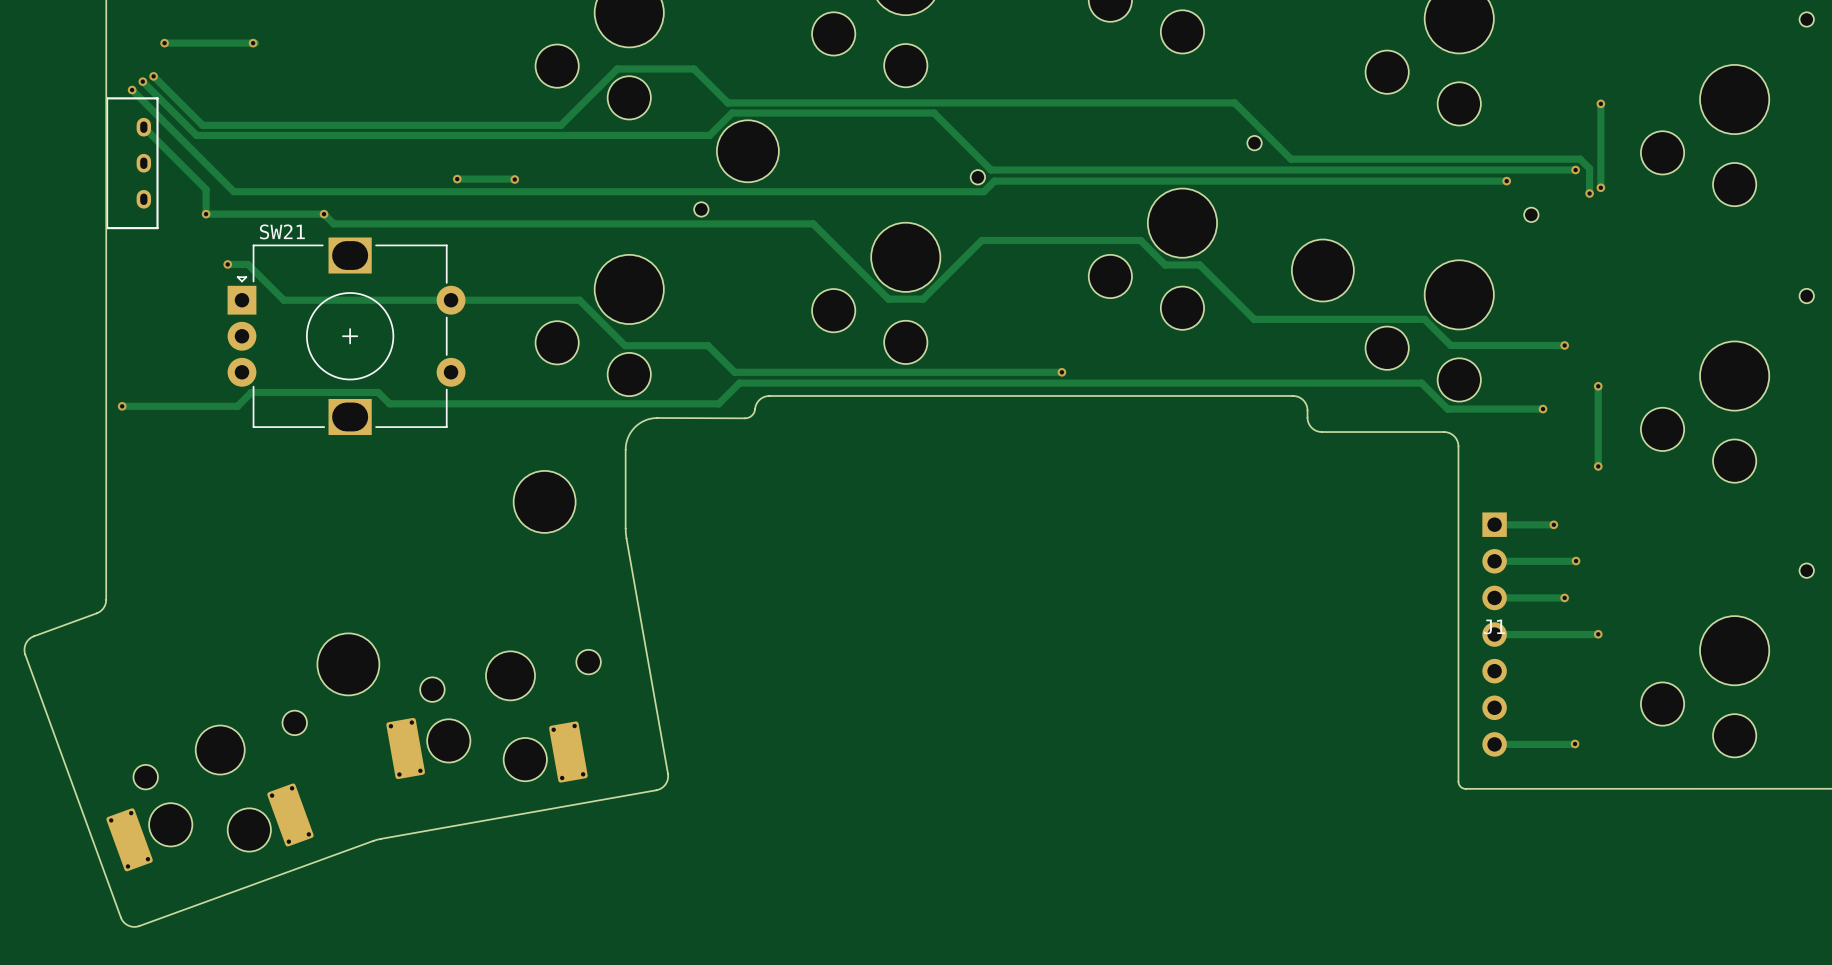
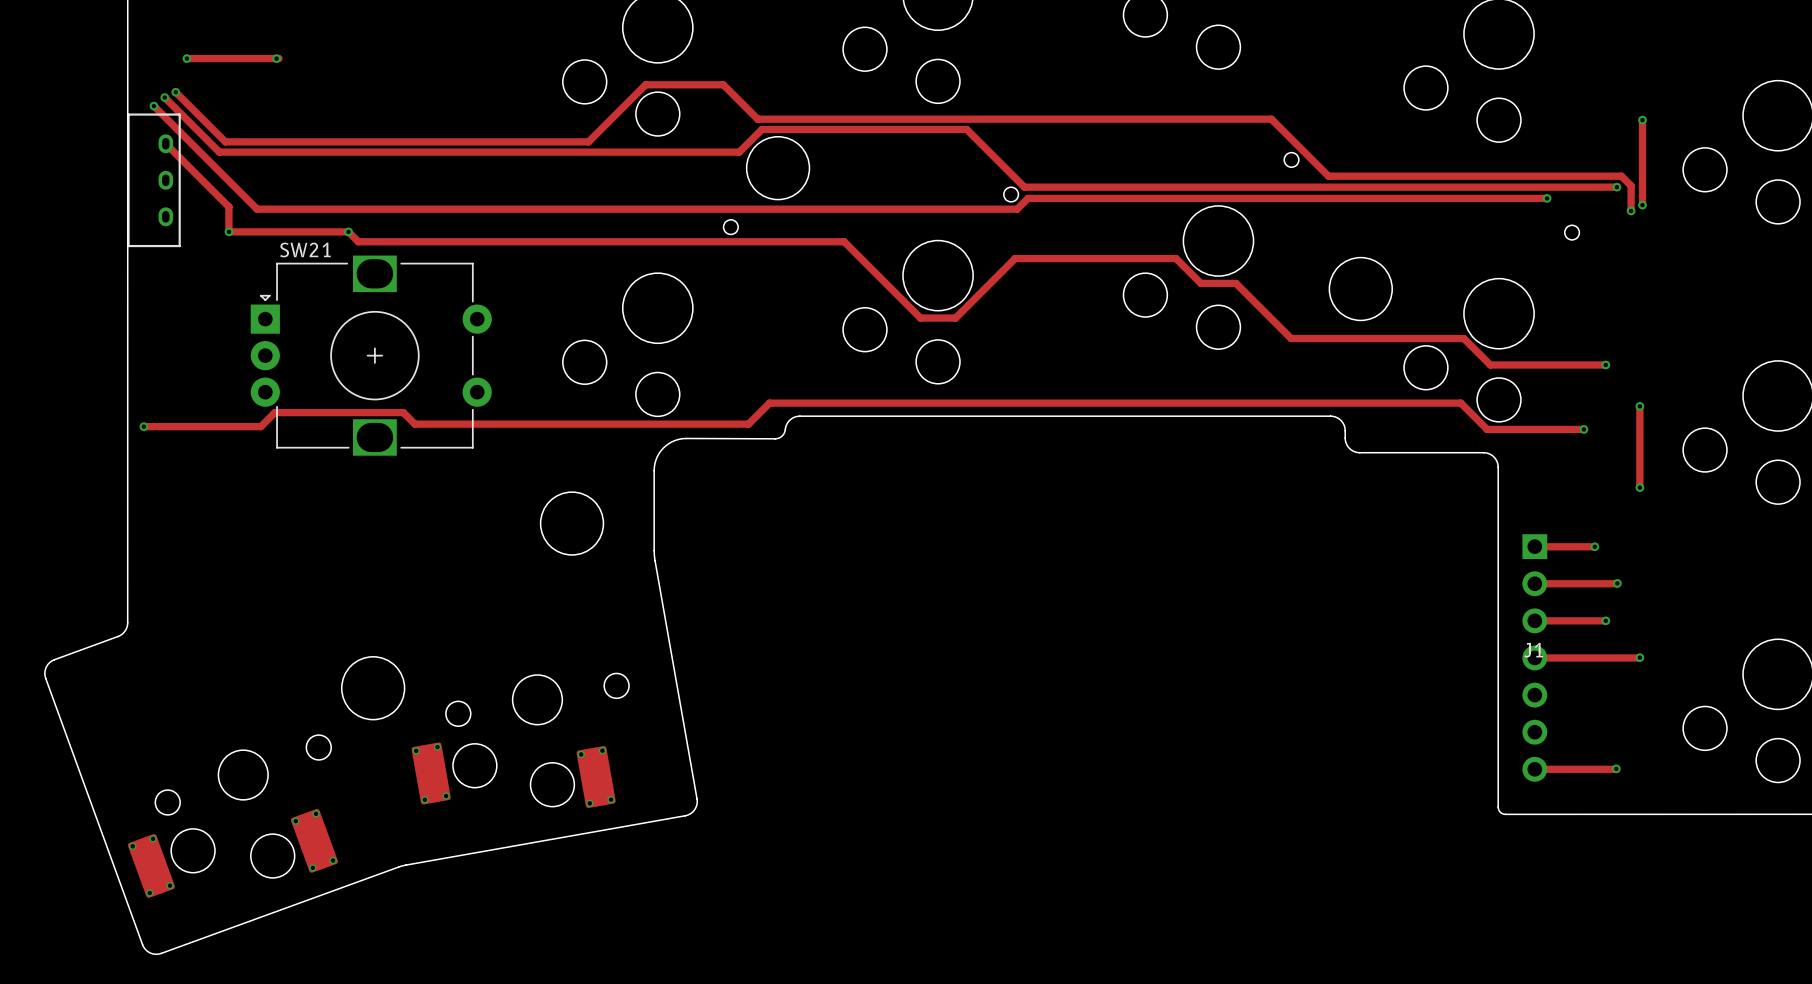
track: (457, 179) (514, 179) -> none
via: (457, 179) -> none
via: (514, 179) -> none
track: (227, 264) (248, 264) (283, 300) (579, 300) (625, 345) (708, 345) (734, 372) (1061, 372) -> none
via: (227, 264) -> none
via: (1061, 372) -> none

